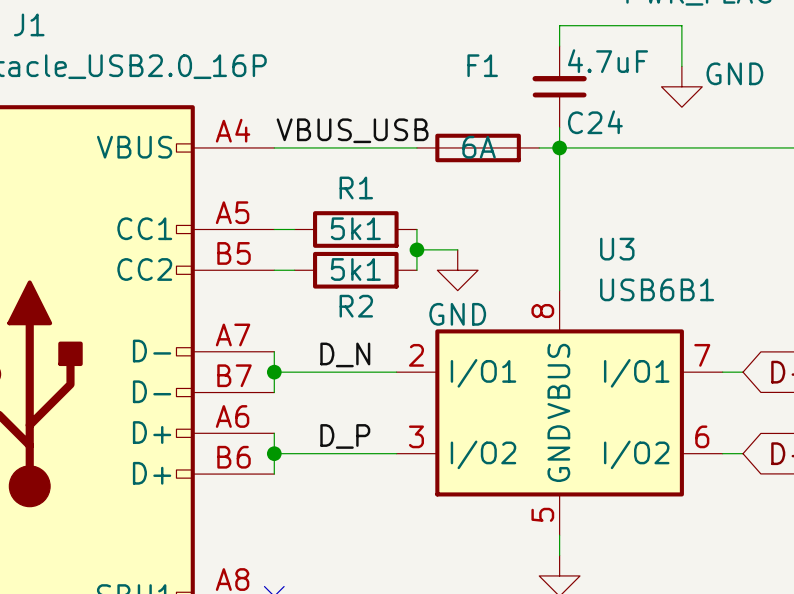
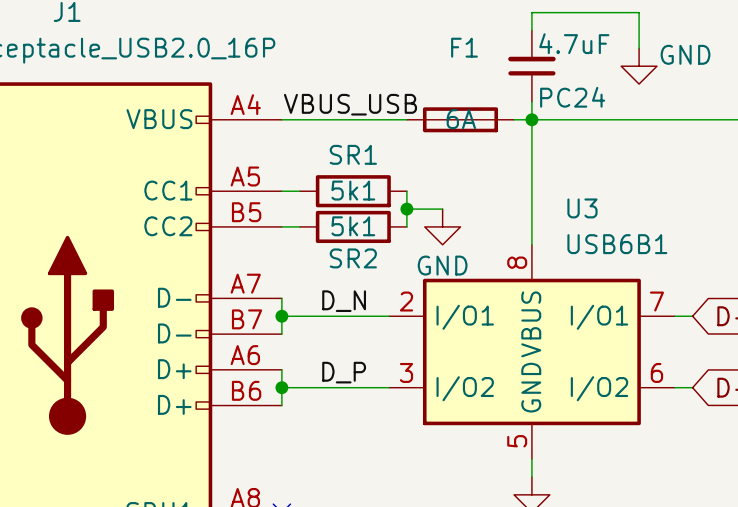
C24 name: C24 (595, 122) -> PC24 (572, 97)
R1 name: R1 (356, 187) -> SR1 (353, 154)
R2 name: R2 (356, 306) -> SR2 (353, 258)

